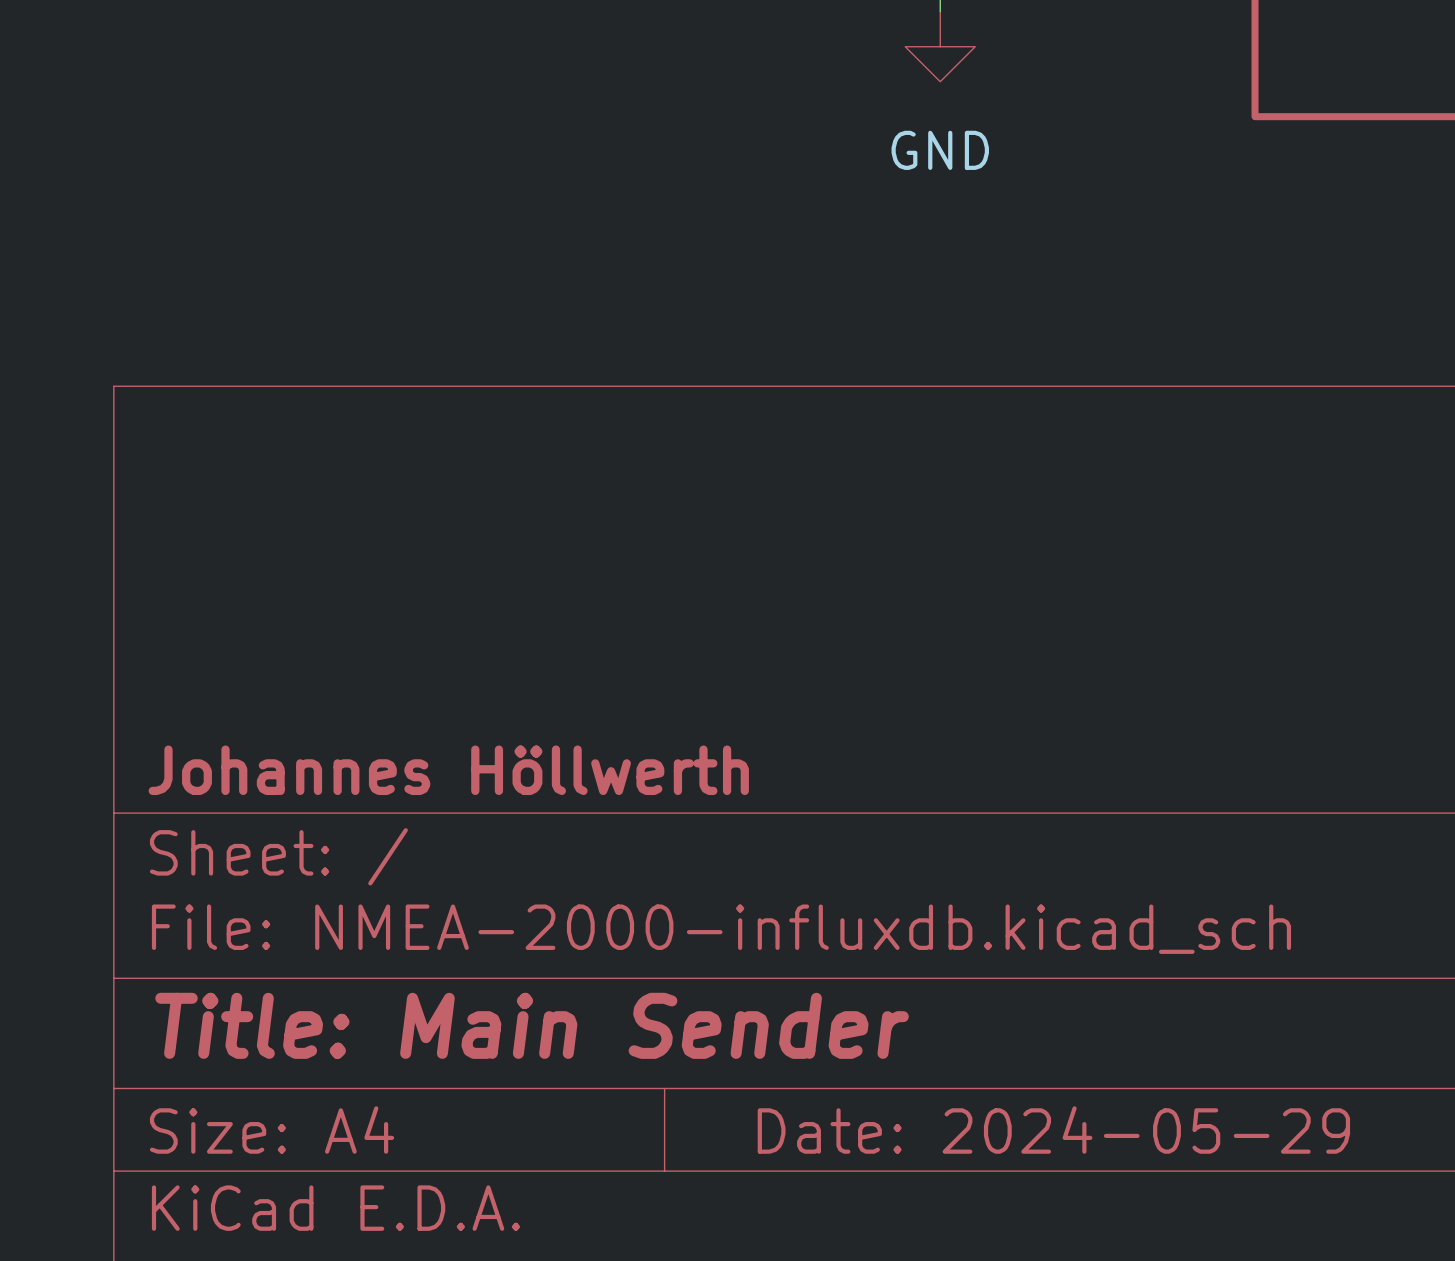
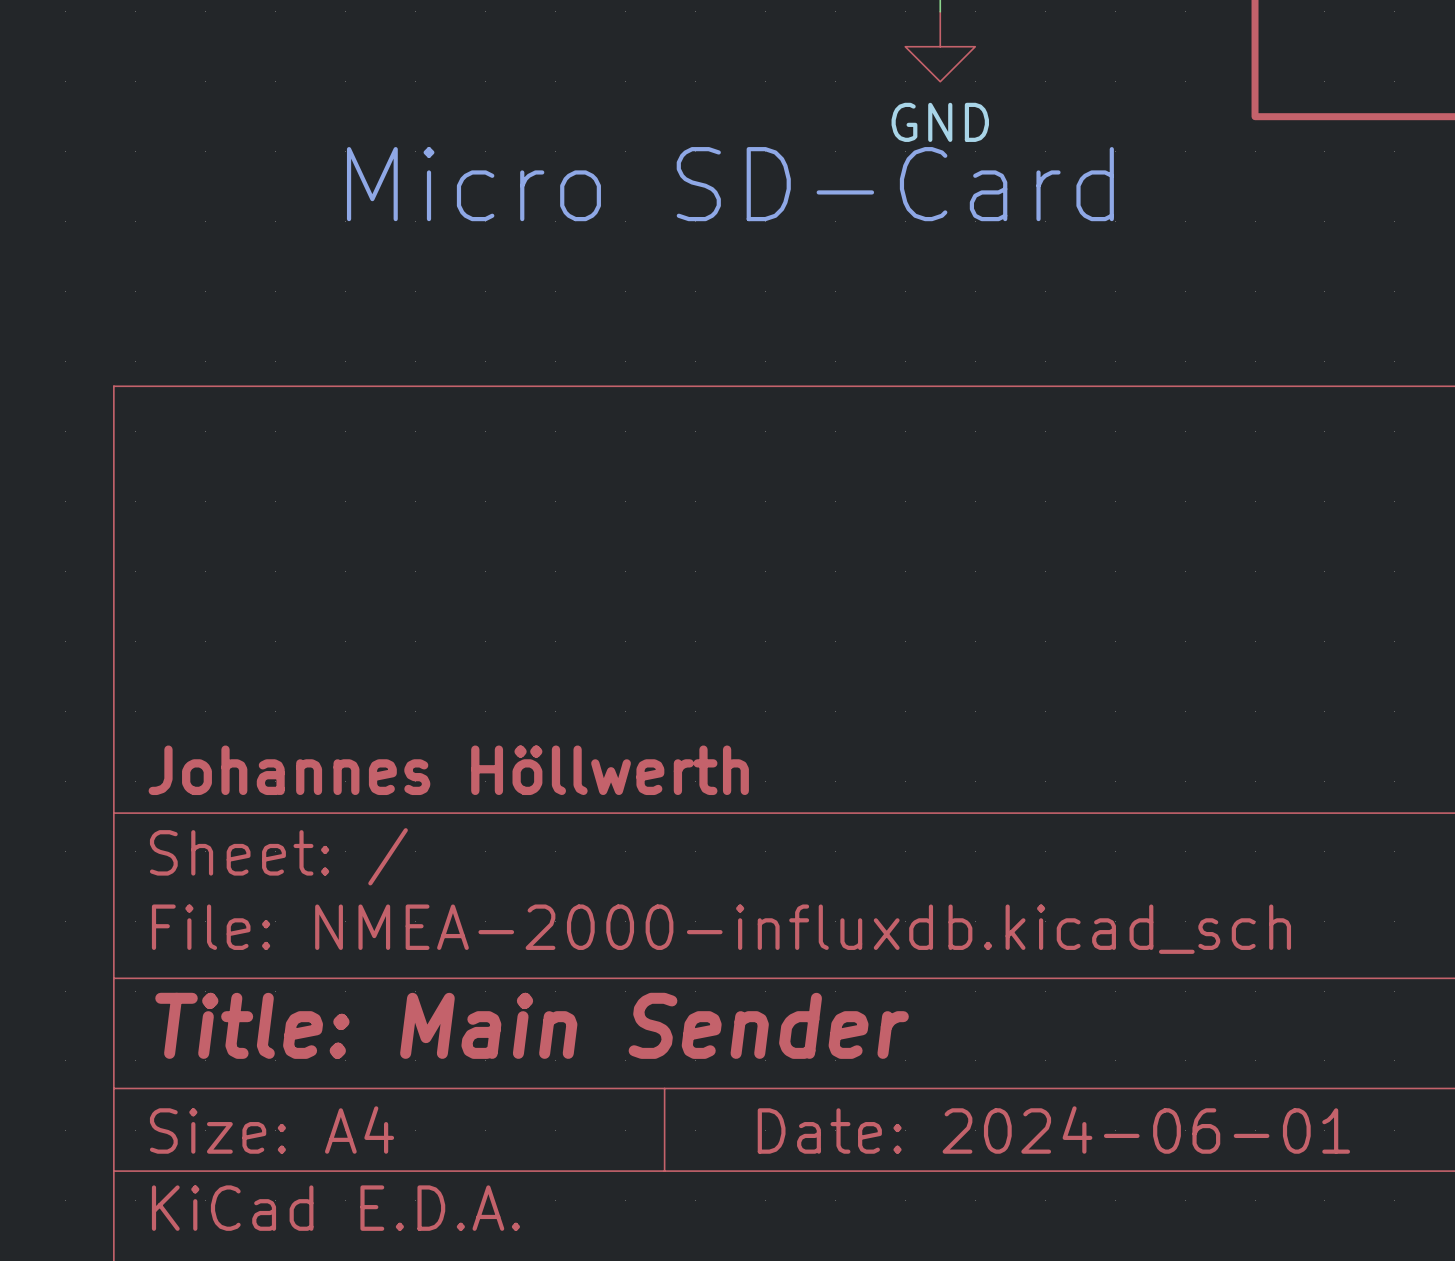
power symbol text position: GND (940, 150) -> GND (940, 122)
text: none -> Micro SD-Card (730, 184)
title block: Date: 2024-05-29 (1053, 1130) -> Date: 2024-06-01 (1053, 1130)

